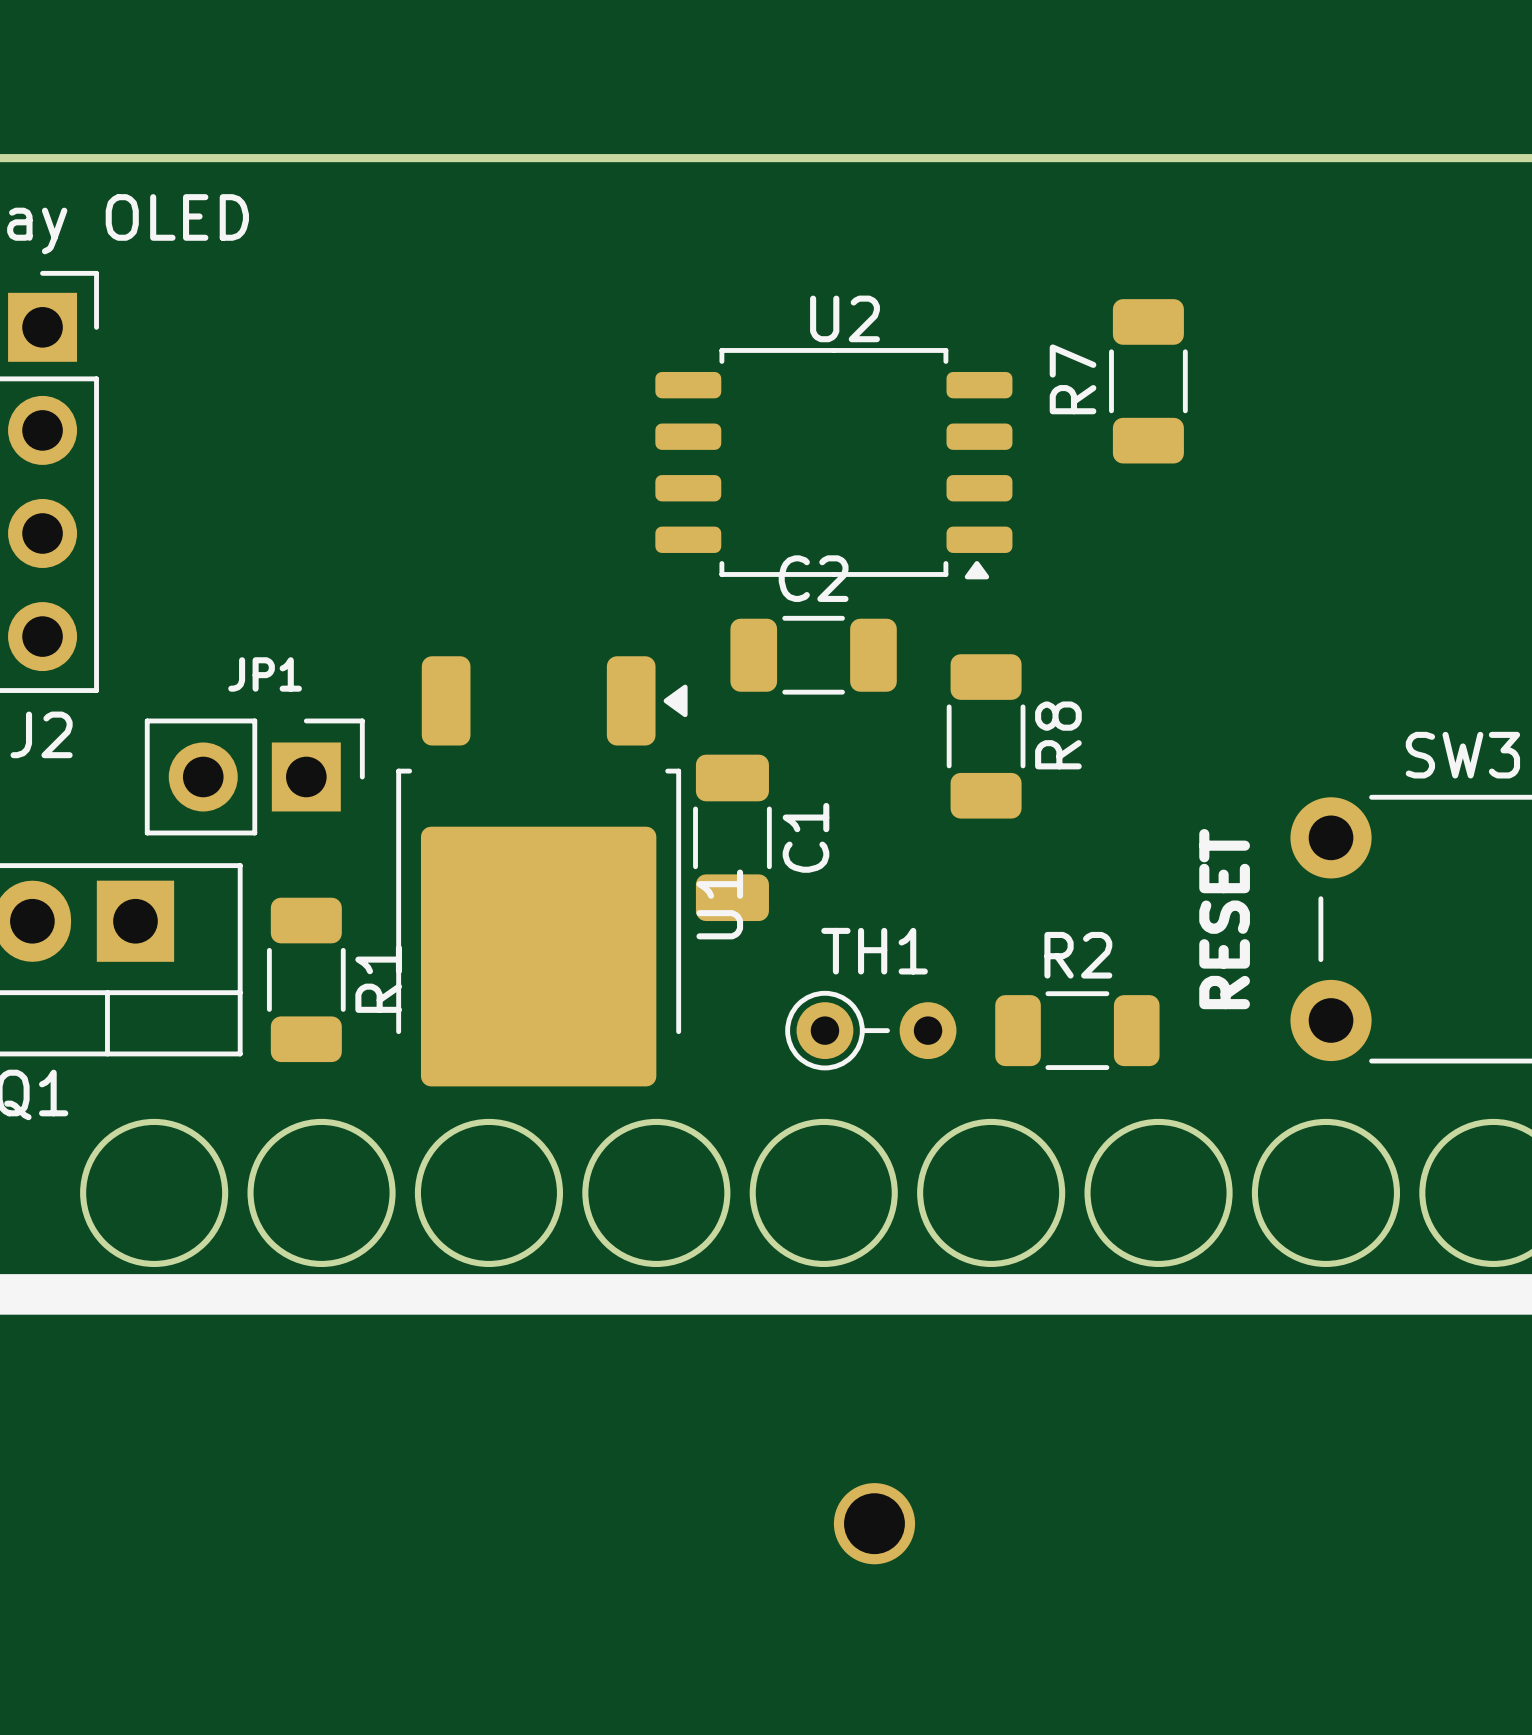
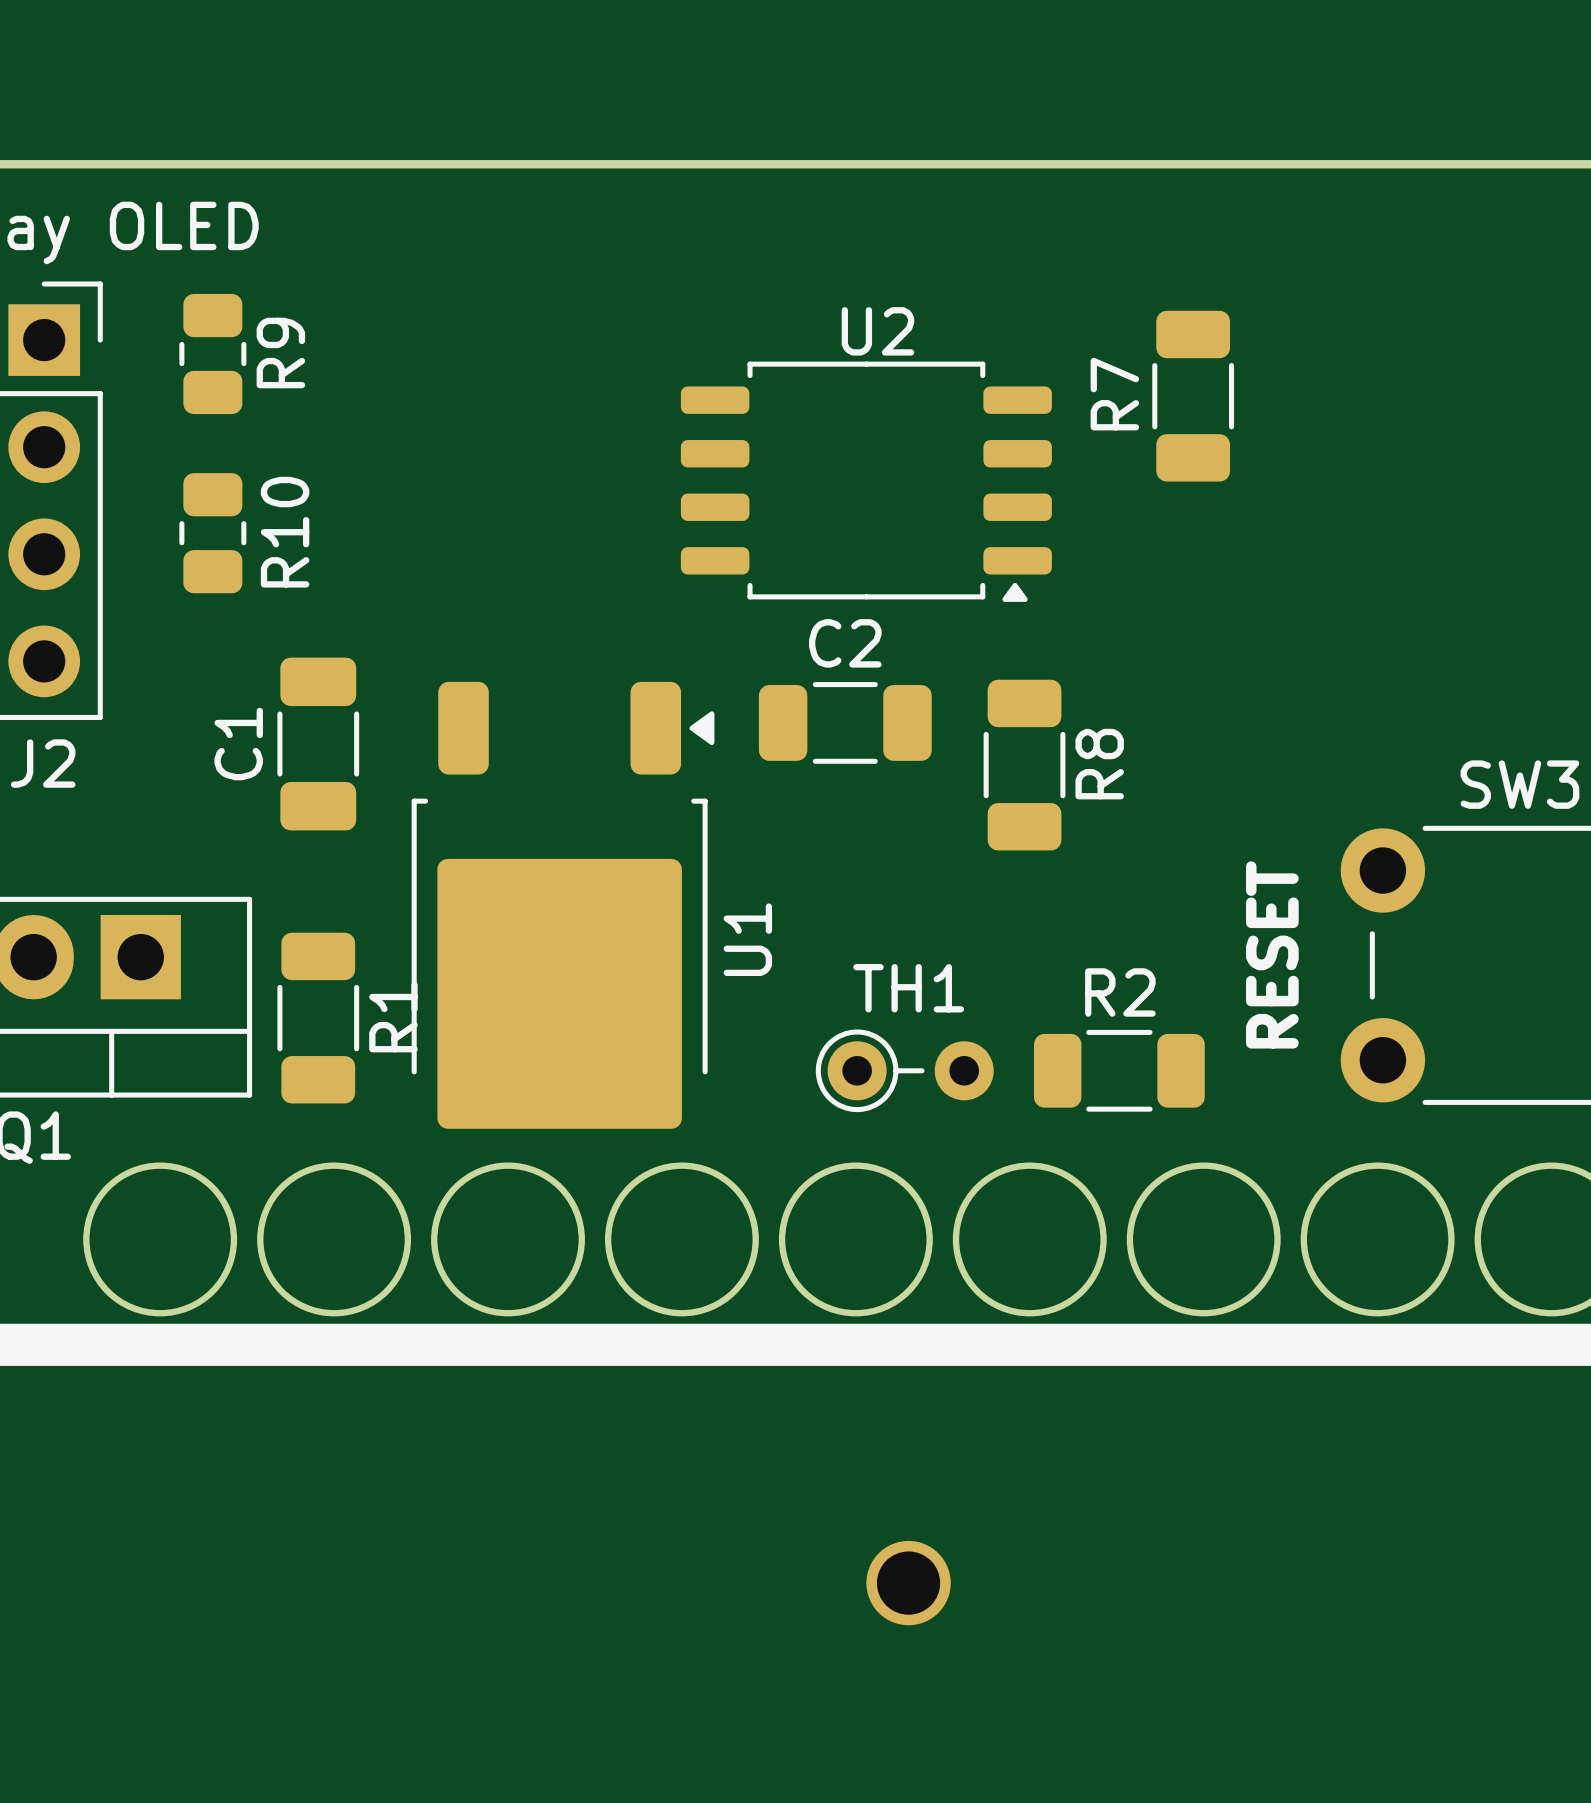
R9: none -> (212, 354)
R10: none -> (212, 533)
C2 position: (813, 655) -> (845, 722)
JP1: (254, 776) -> none
C1 position: (732, 837) -> (318, 744)
C1 name position: C1 (806, 837) -> C1 (238, 744)

